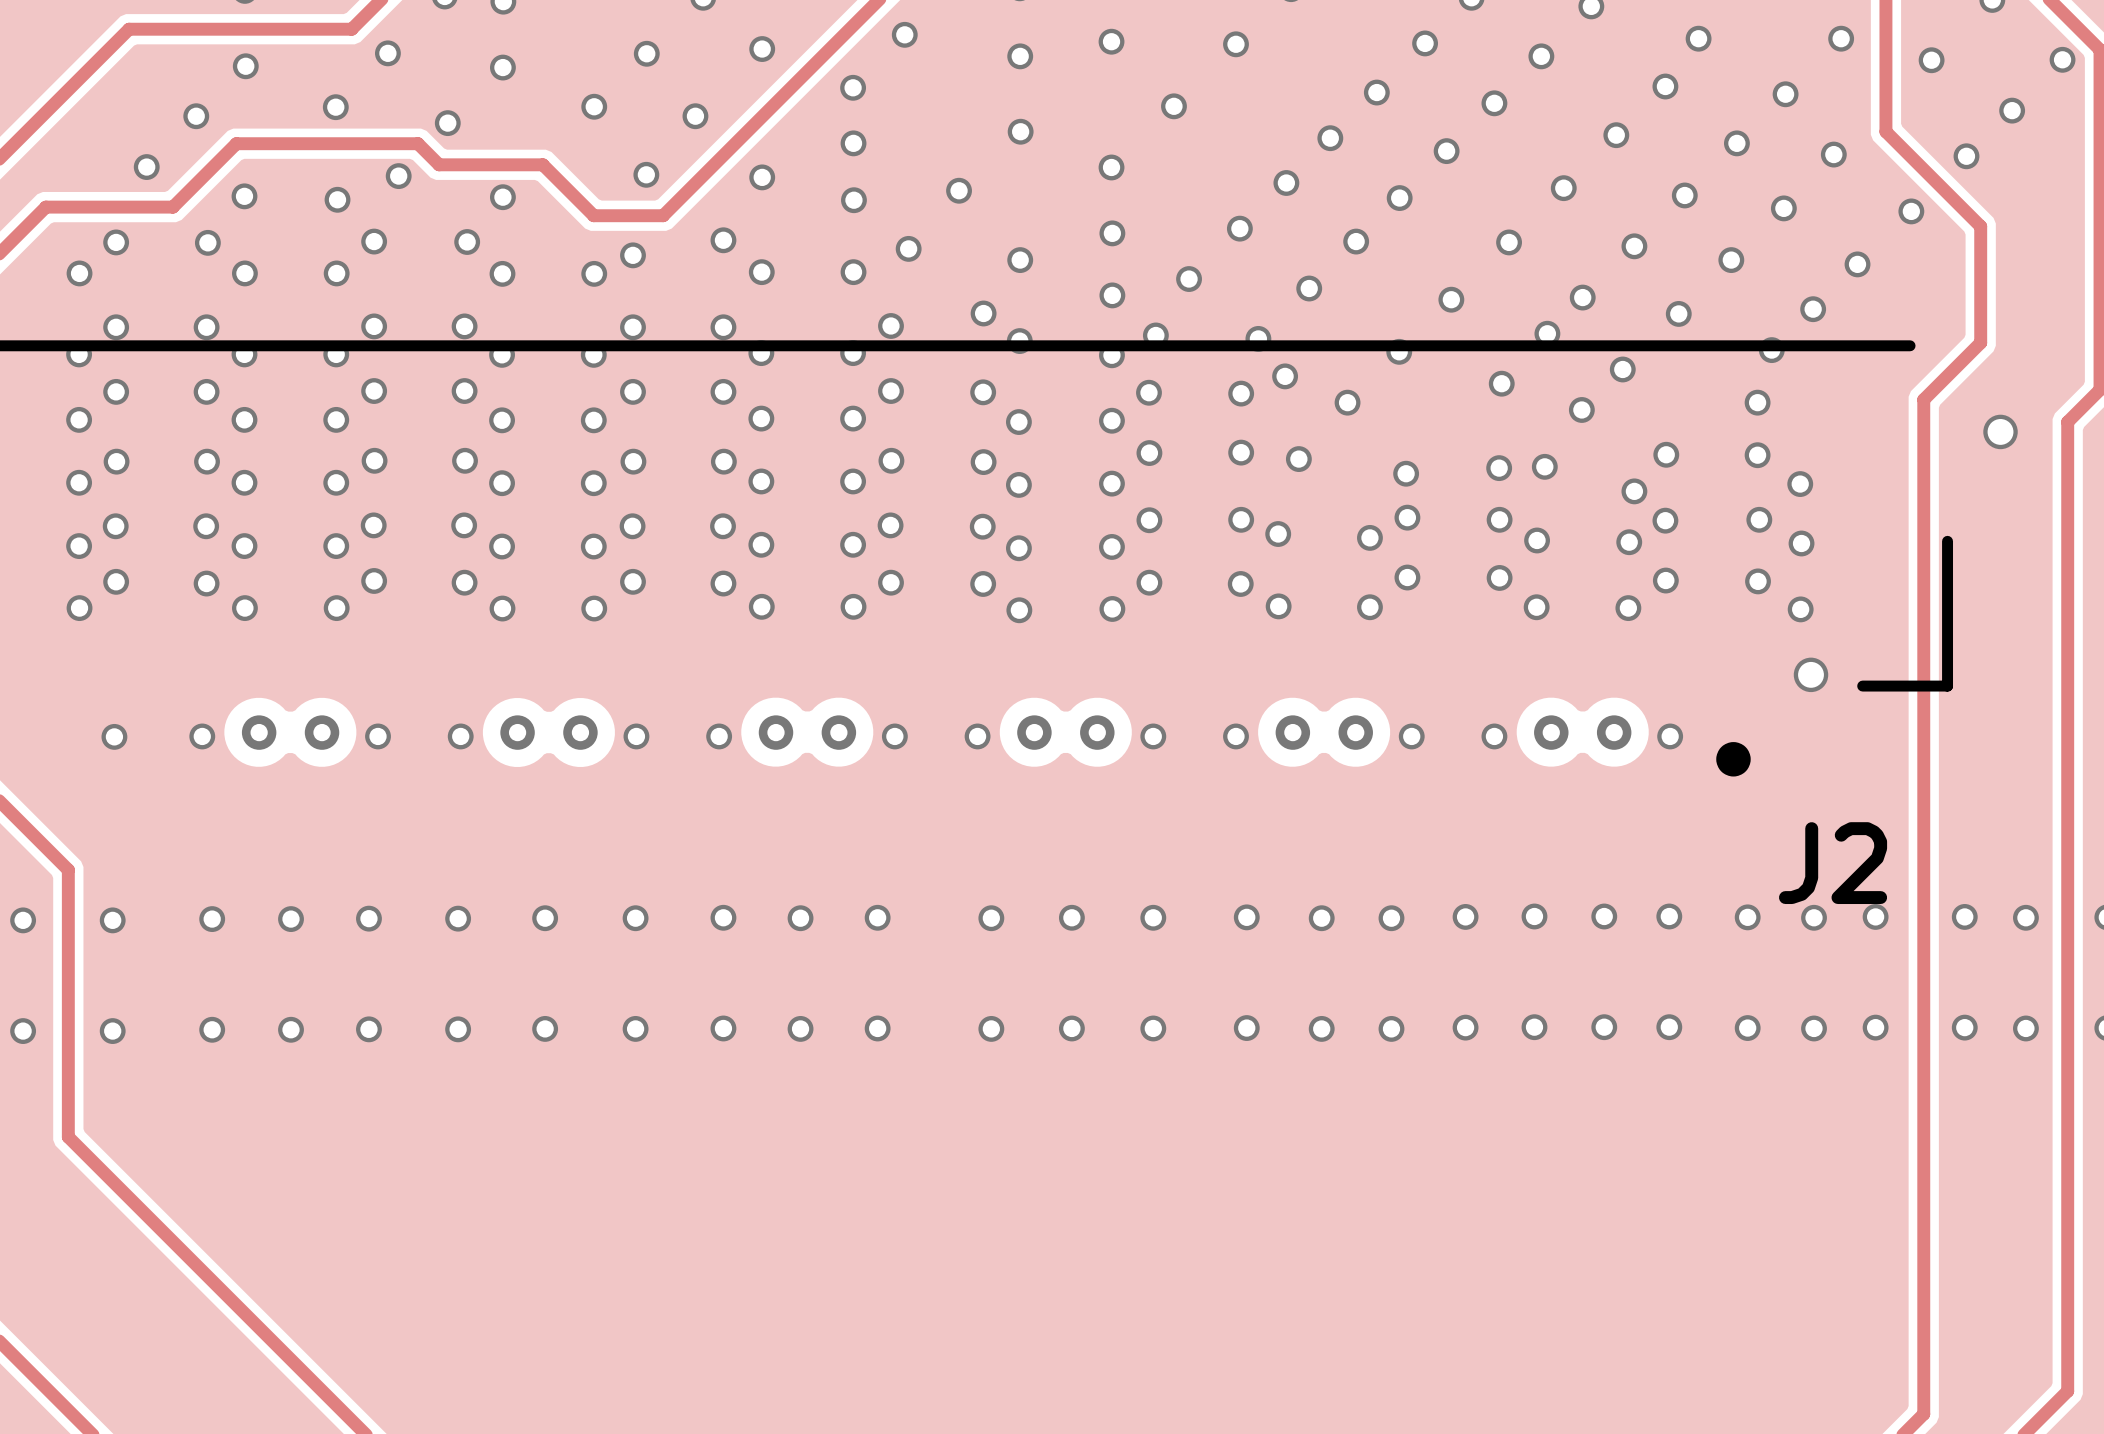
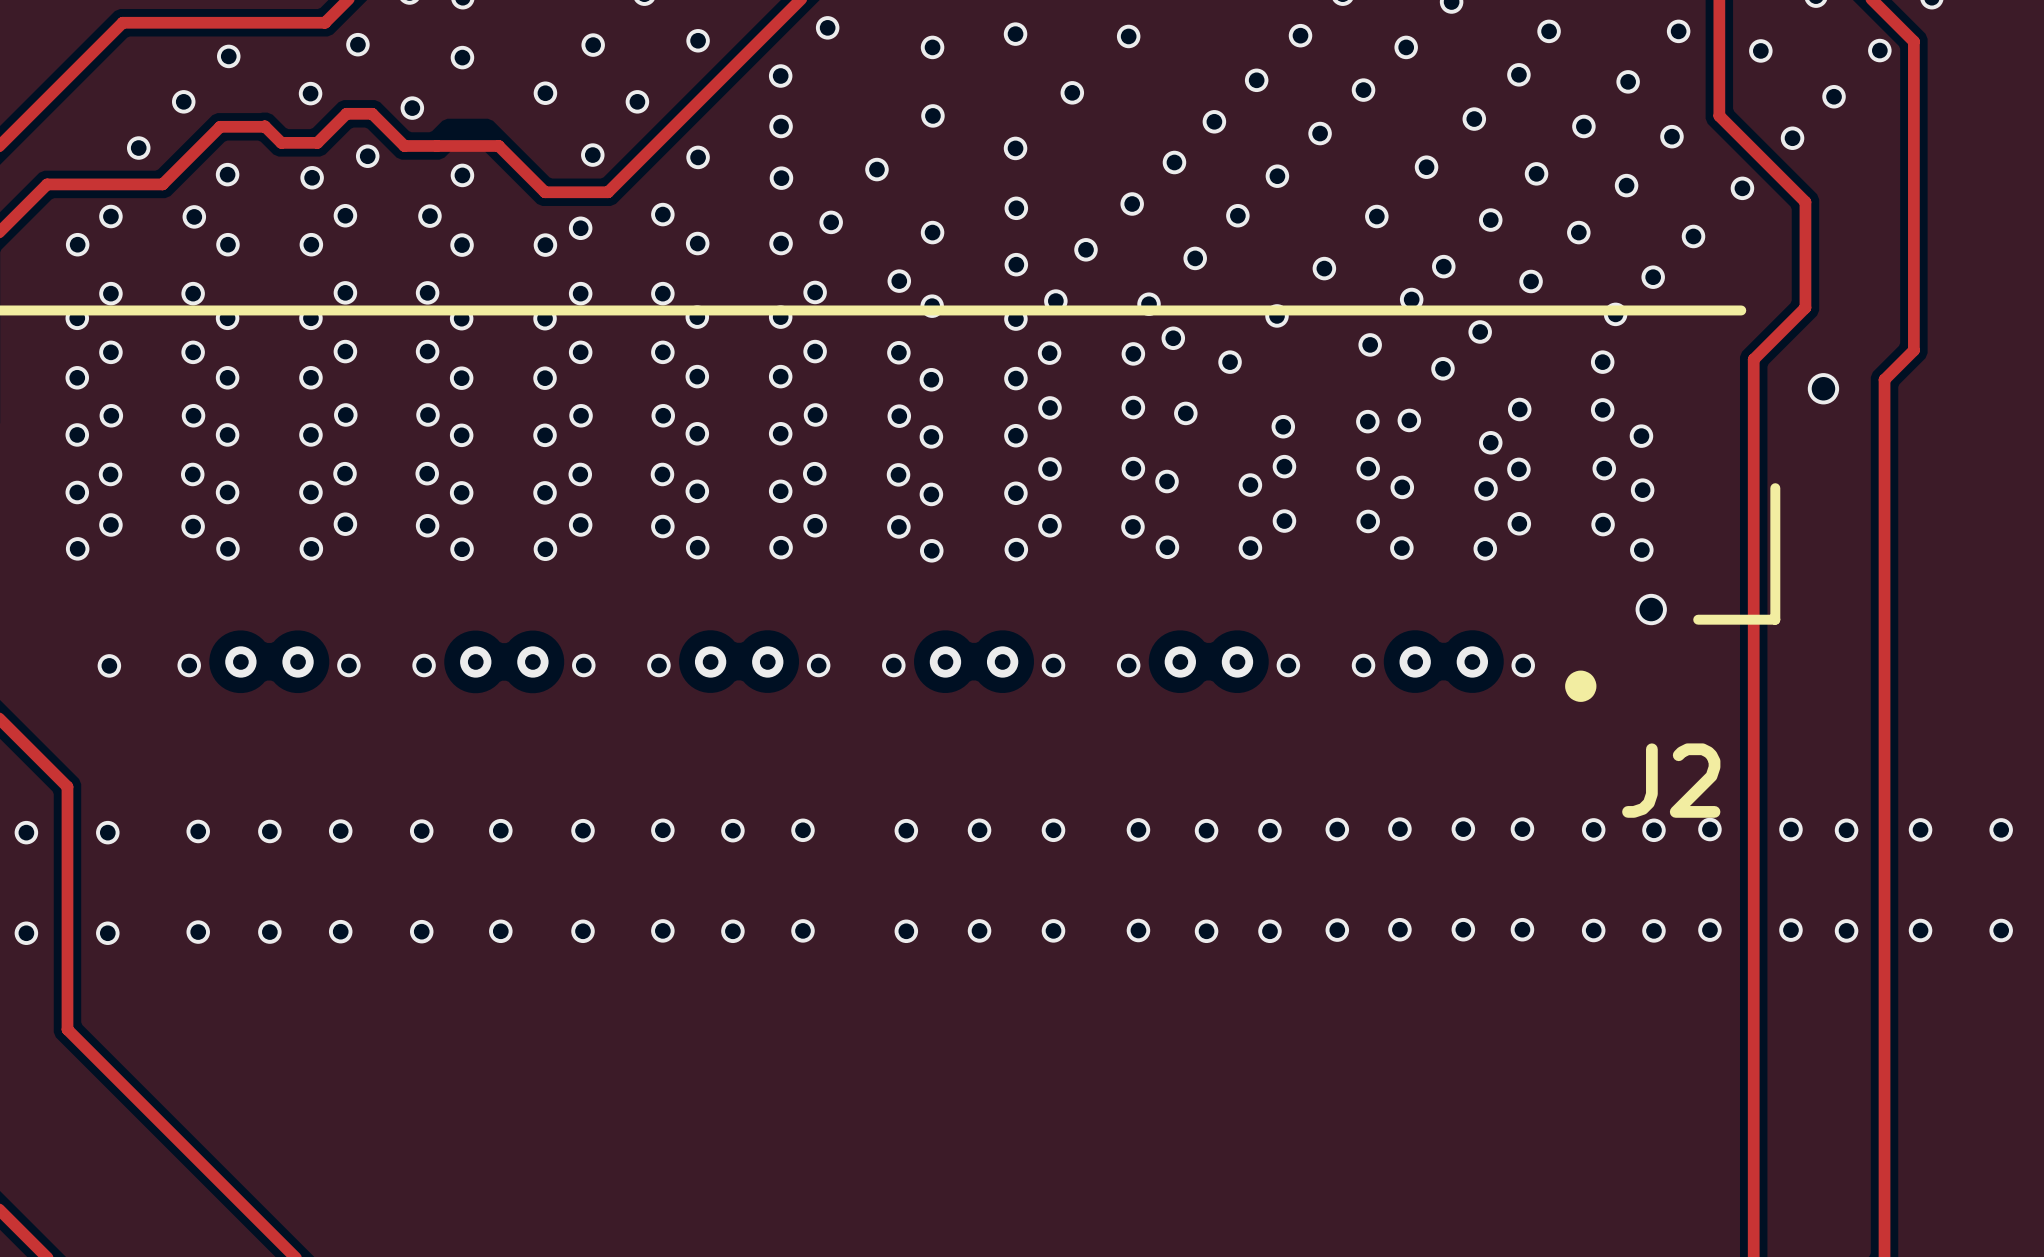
track: (284, 143) (417, 143) -> (264, 126) (281, 142) (317, 142) (346, 113) (372, 113) (385, 126)

